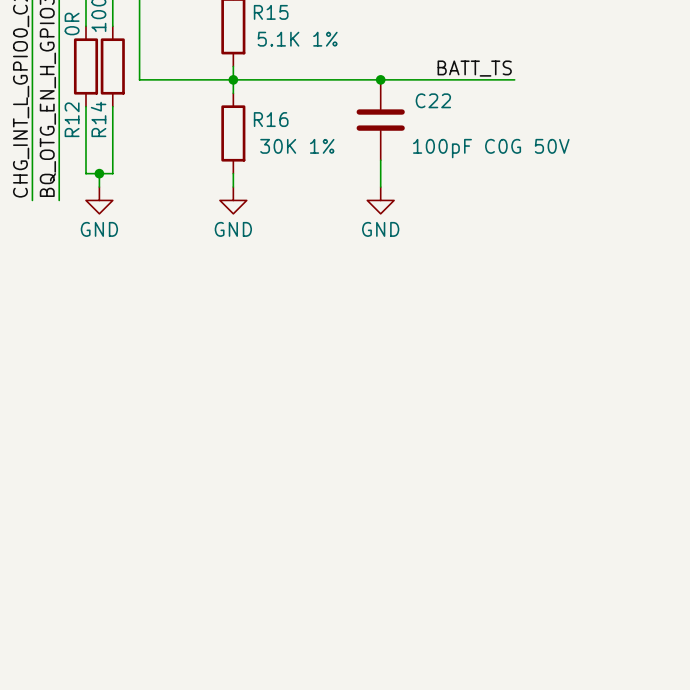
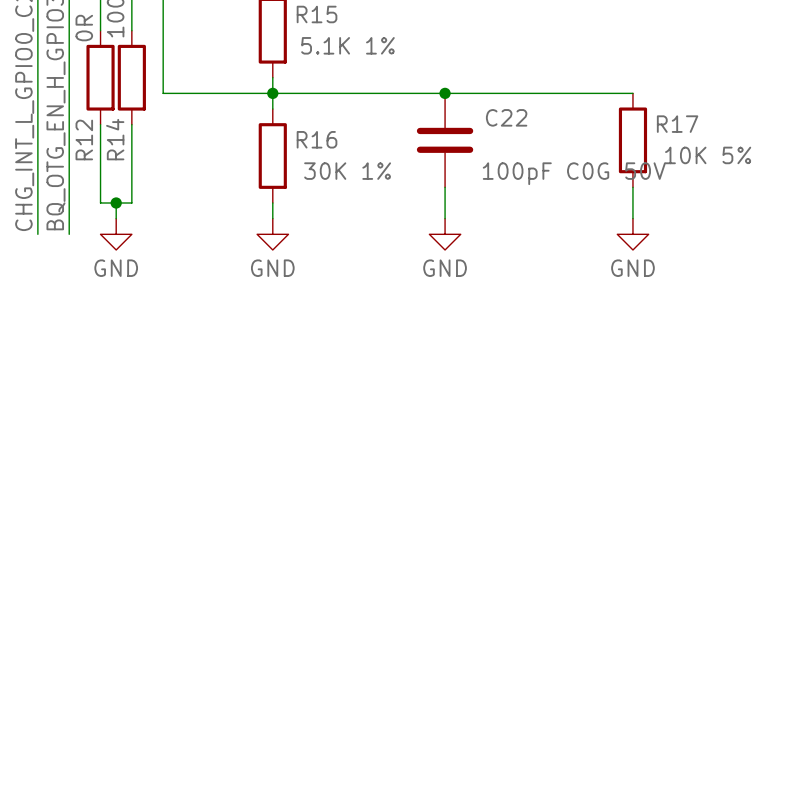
label: BATT_TS (474, 68) -> none
wire: none -> (601, 93) (632, 93)
R17: none -> 10K 5% (632, 140)
wire: none -> (632, 187) (632, 218)
power symbol: none -> GND (632, 234)

